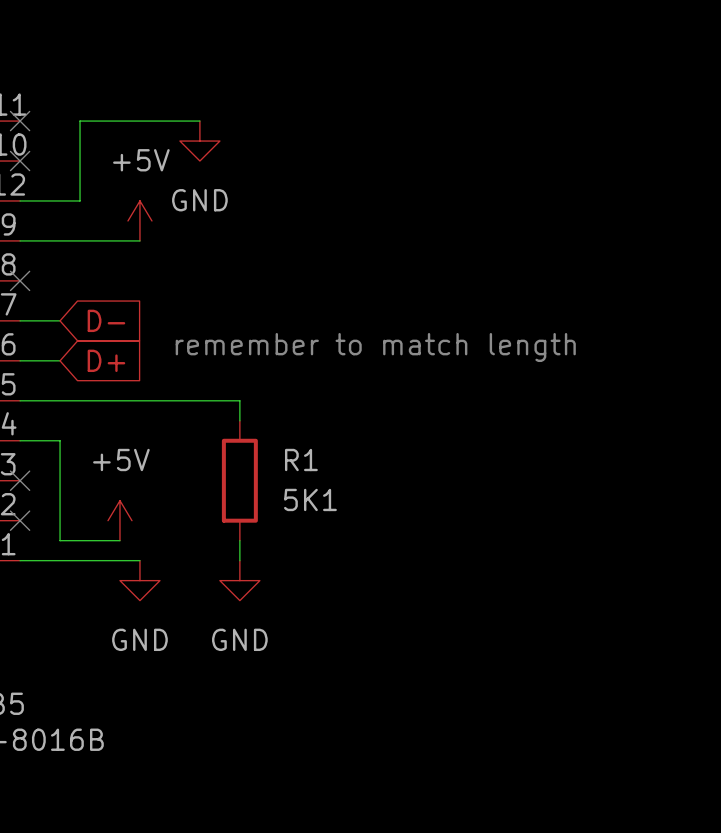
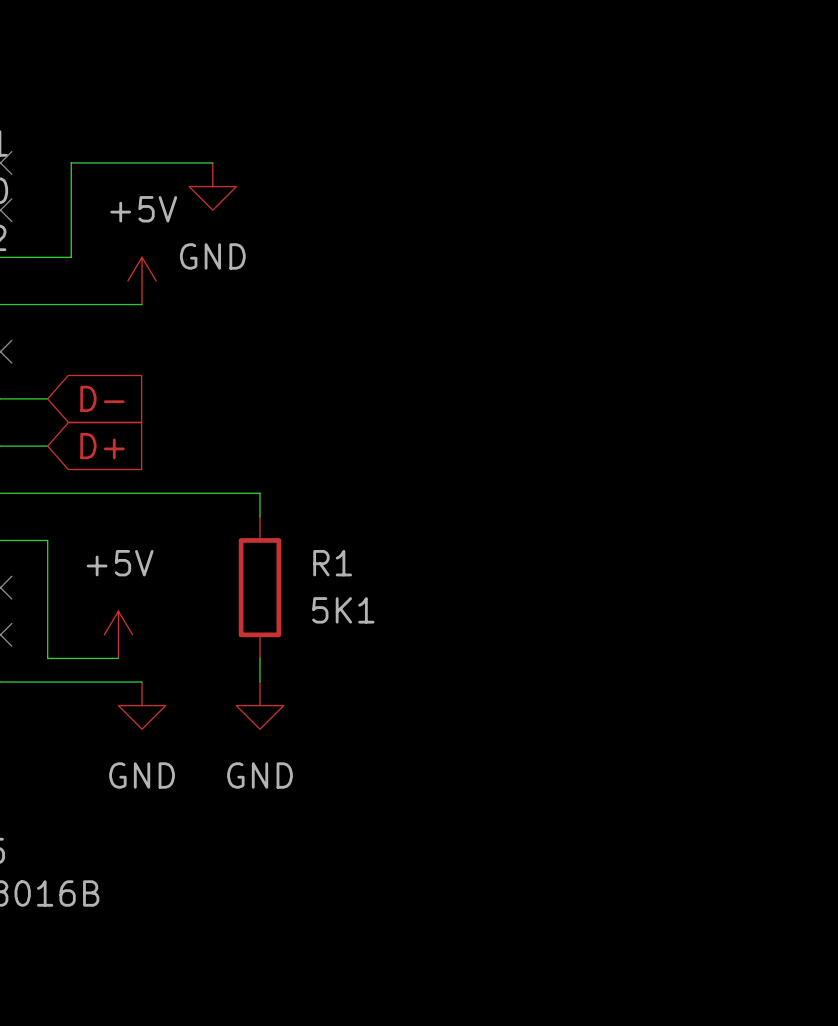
text: remember to match length (375, 347) -> none

